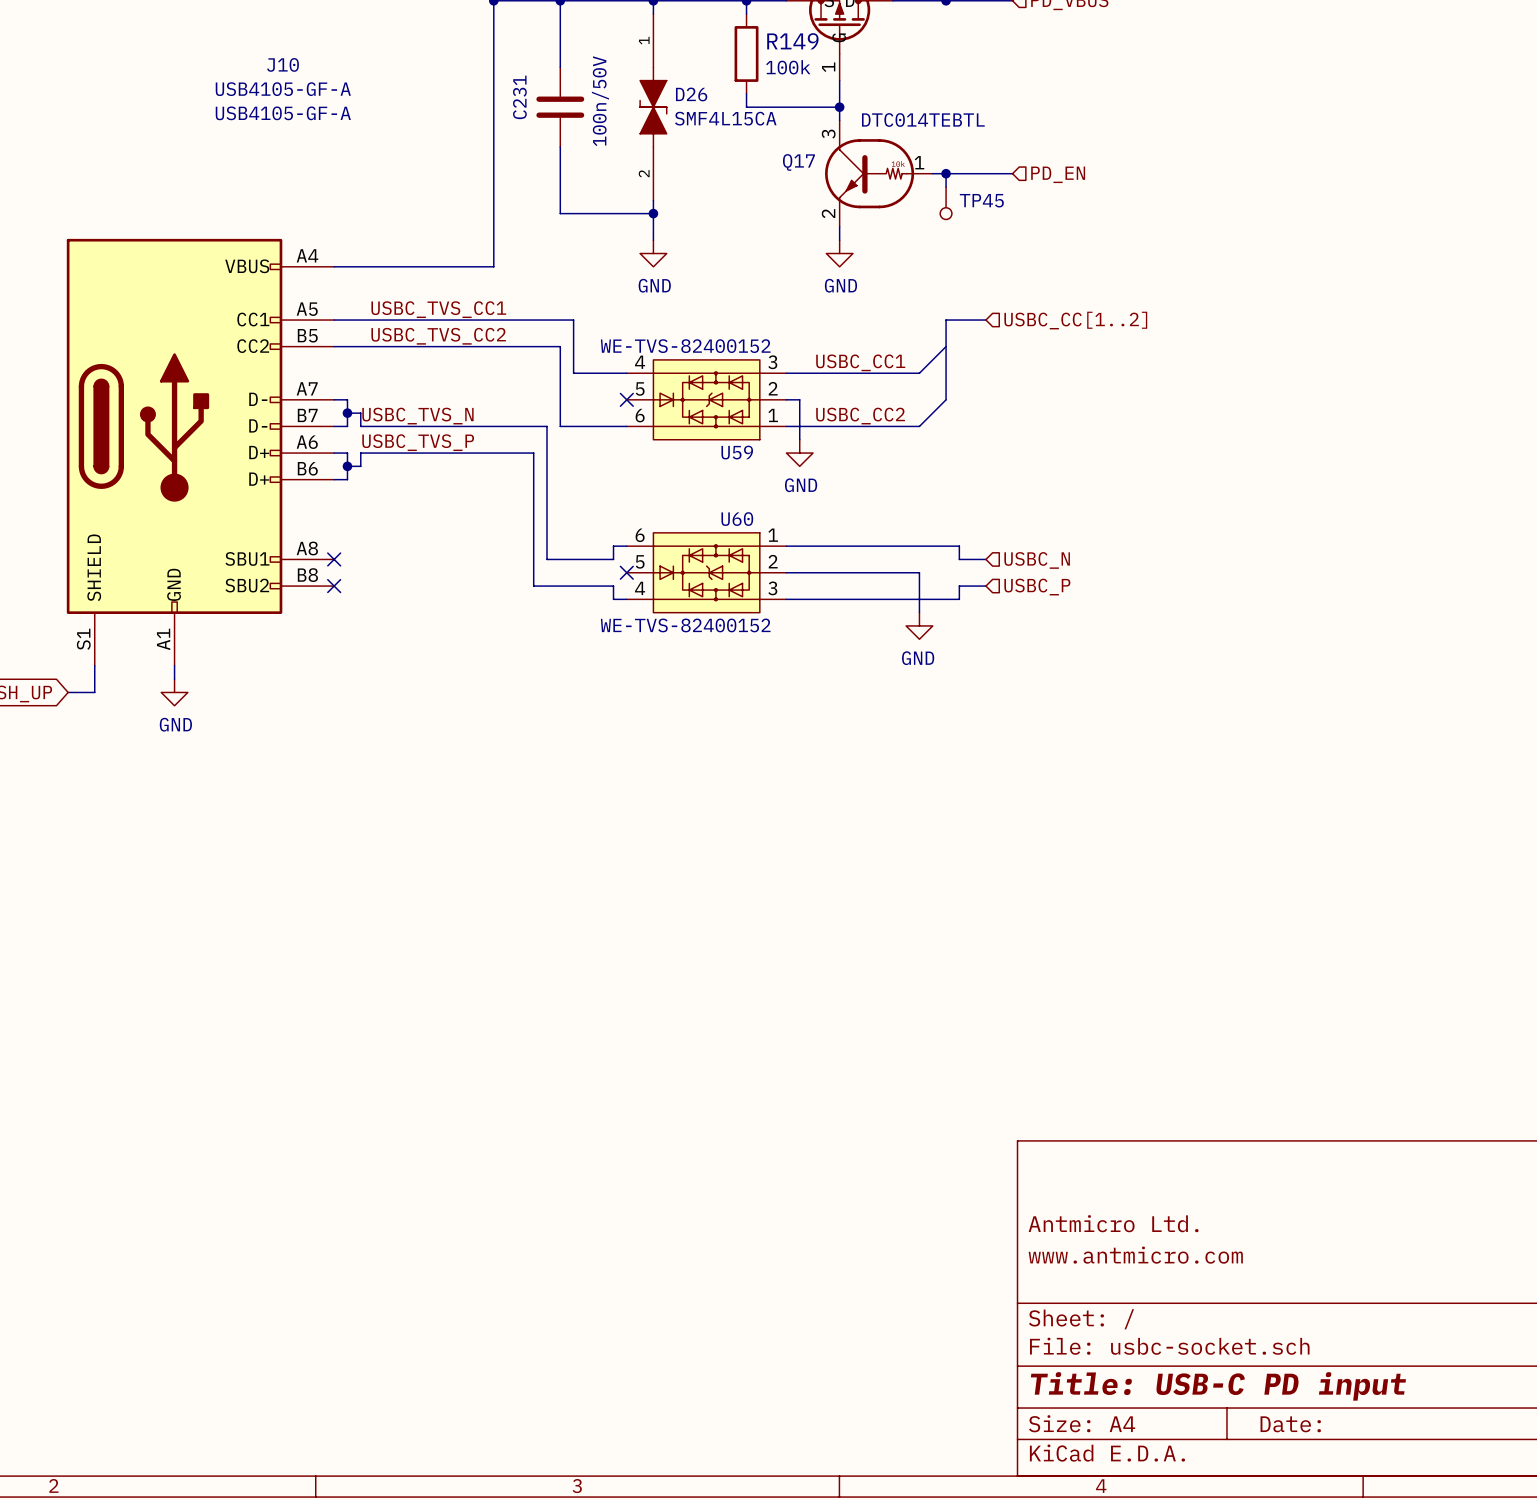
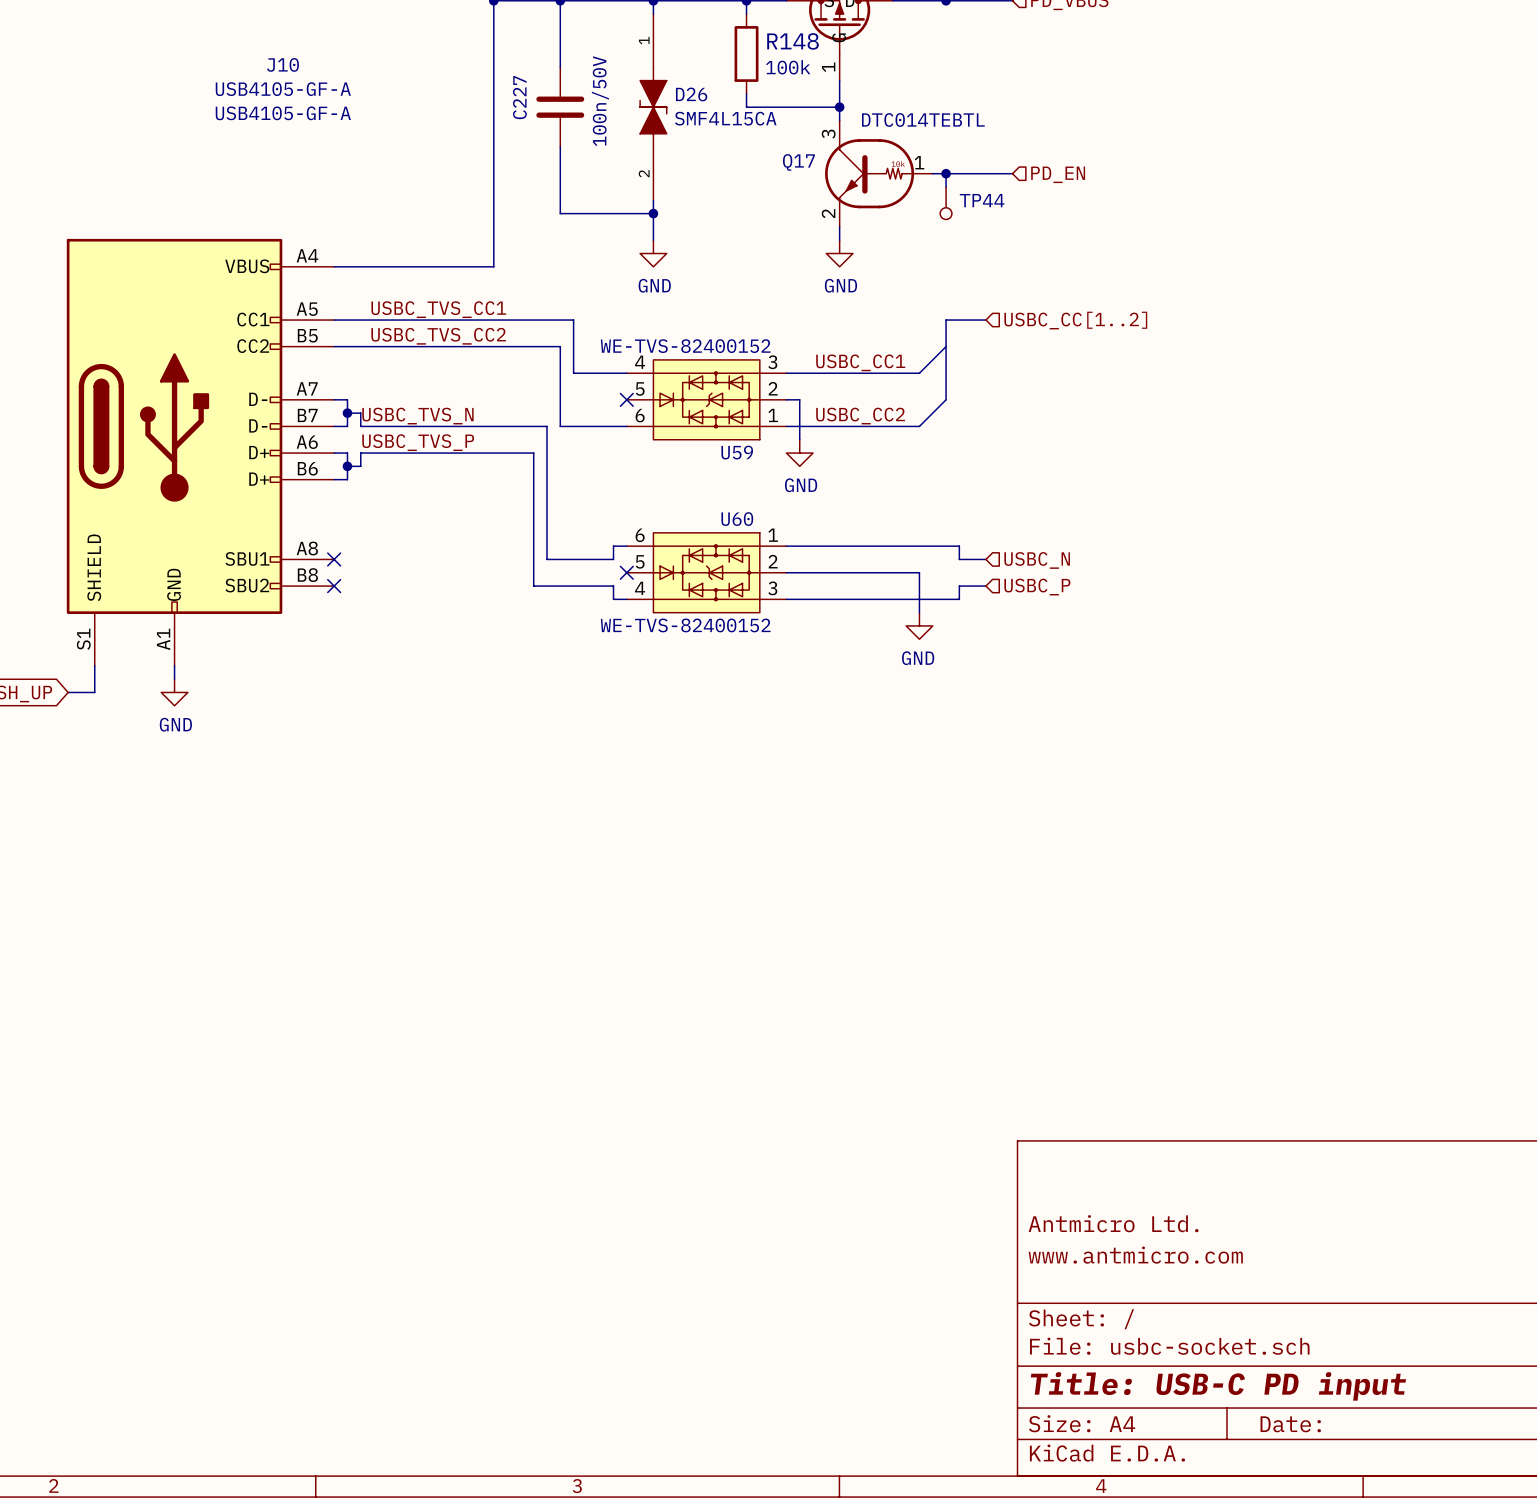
R149 name: R149 (792, 41) -> R148 (792, 41)
C231 name: C231 (519, 97) -> C227 (519, 97)
TP45 name: TP45 (981, 200) -> TP44 (982, 200)

